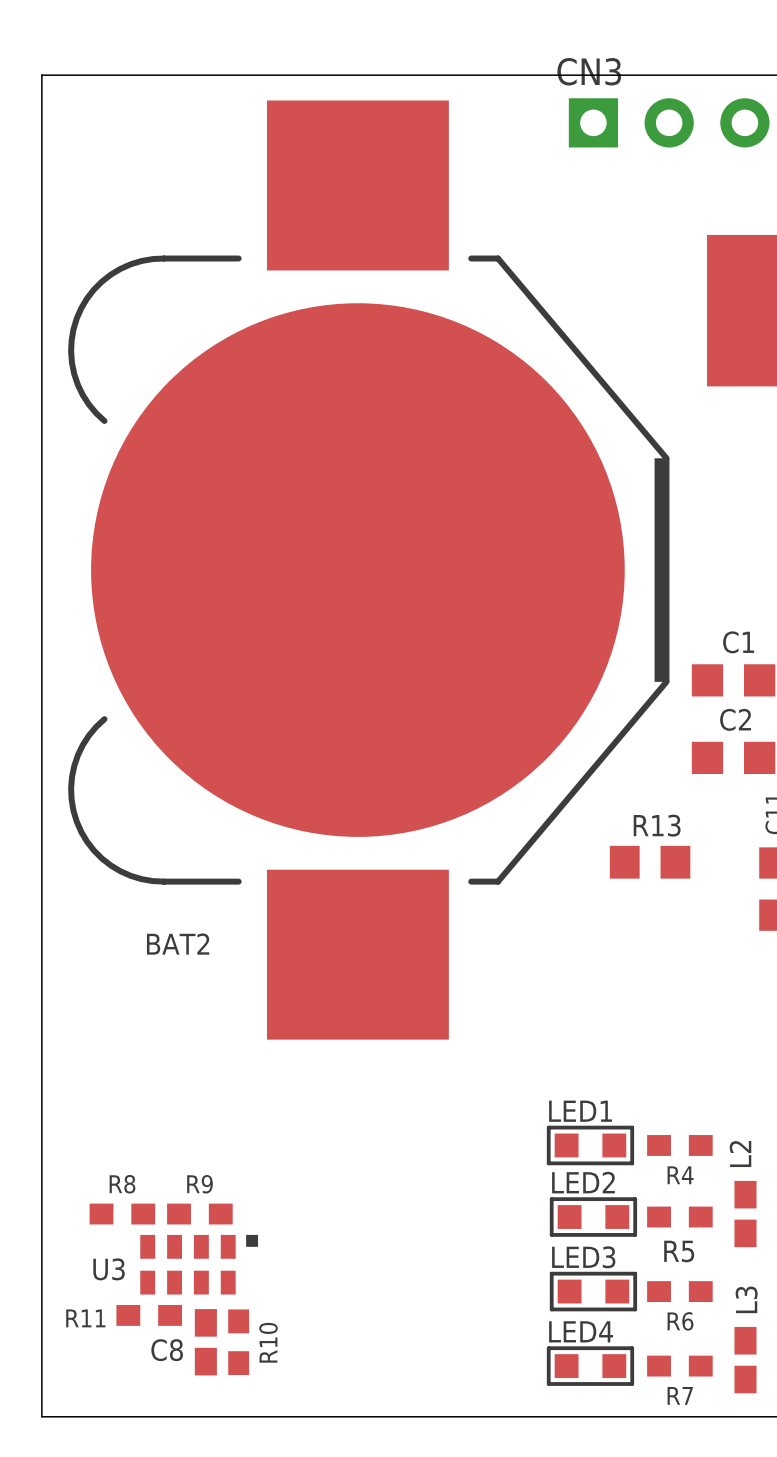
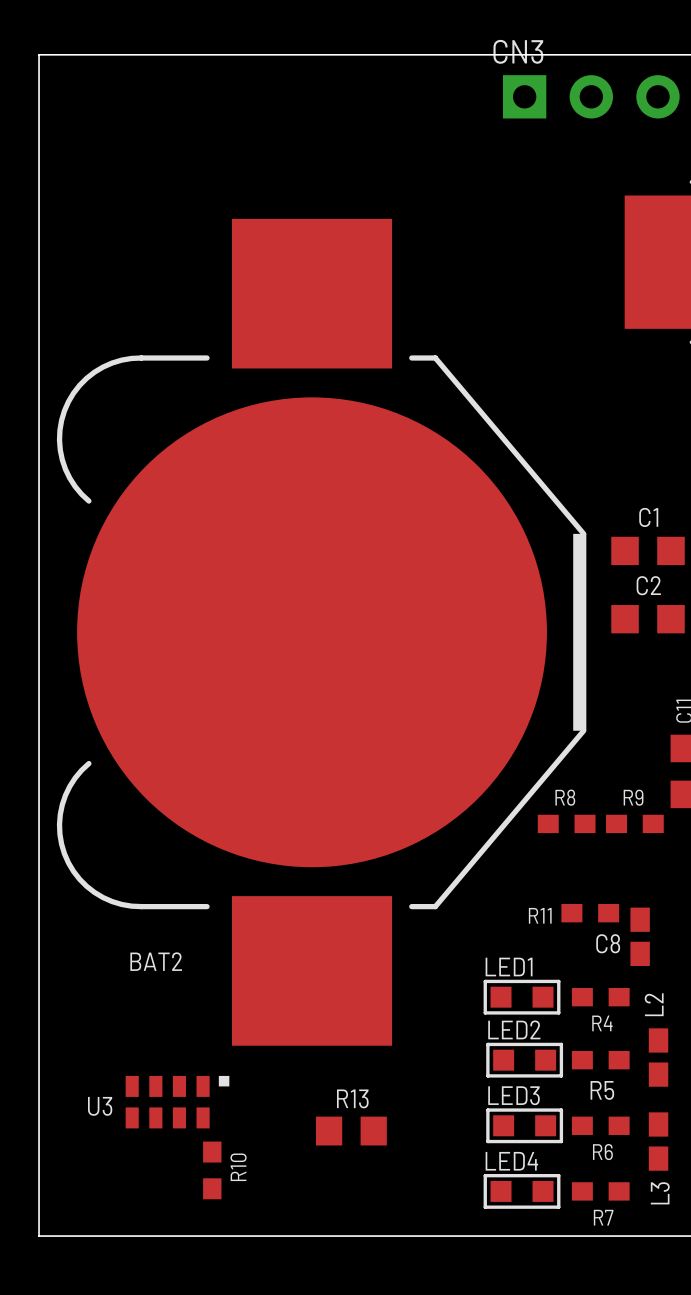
BAT2 position: (368, 570) -> (321, 632)
C1 position: (733, 680) -> (648, 550)
C2 position: (733, 757) -> (648, 619)
R13 position: (650, 862) -> (351, 1131)
R8 position: (122, 1214) -> (566, 823)
R9 position: (199, 1214) -> (634, 823)
L3 name position: L3 (746, 1299) -> L3 (660, 1193)
R11 position: (149, 1315) -> (590, 913)
C8 position: (205, 1342) -> (640, 936)
L3 position: (745, 1360) -> (658, 1141)

